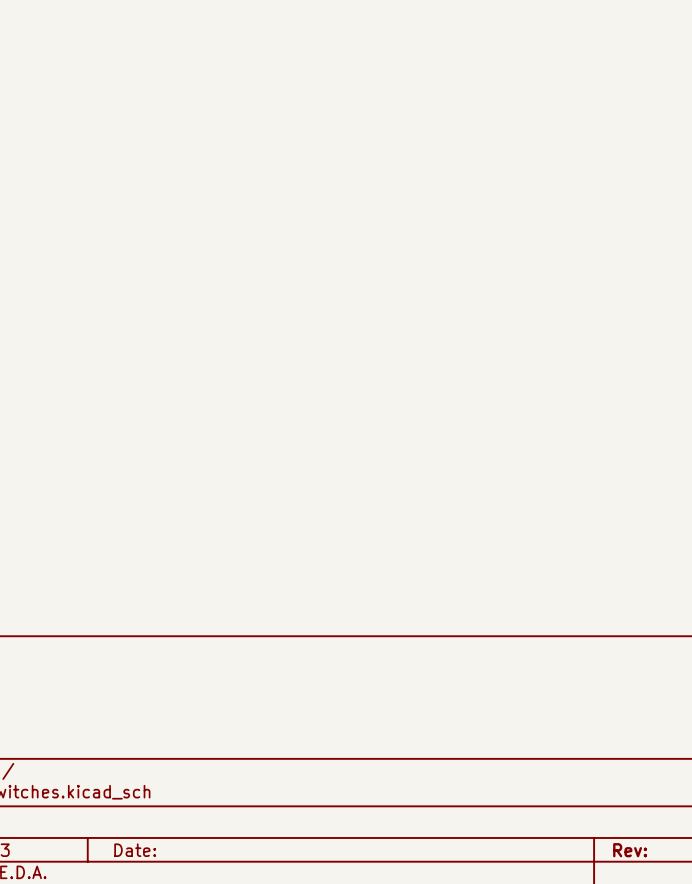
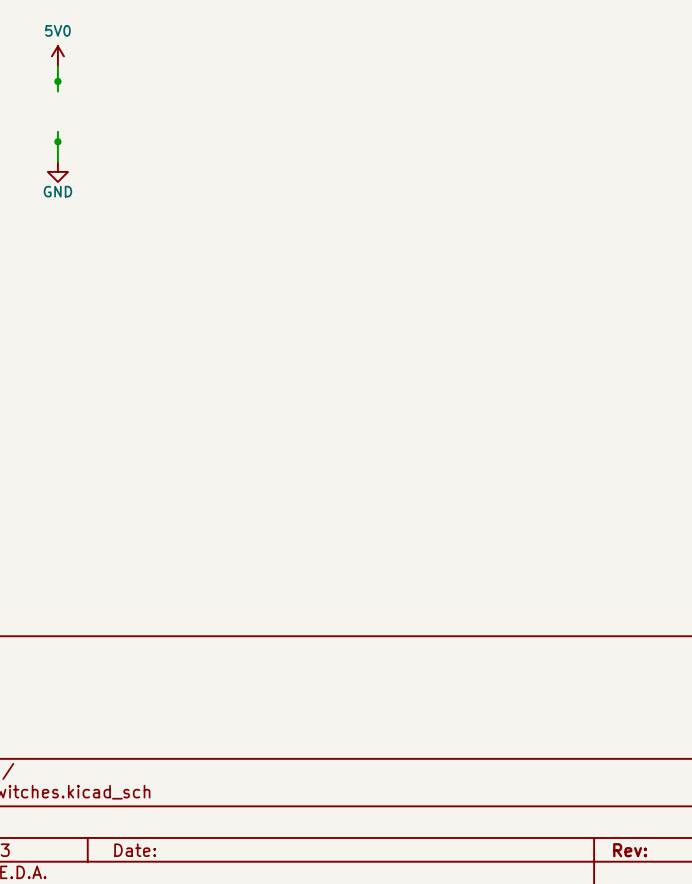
power symbol: none -> 5V0 (57, 56)
wire: none -> (57, 66) (57, 91)
junction: none -> (57, 81)
wire: none -> (57, 131) (57, 161)
junction: none -> (57, 141)
power symbol: none -> GND (57, 171)

